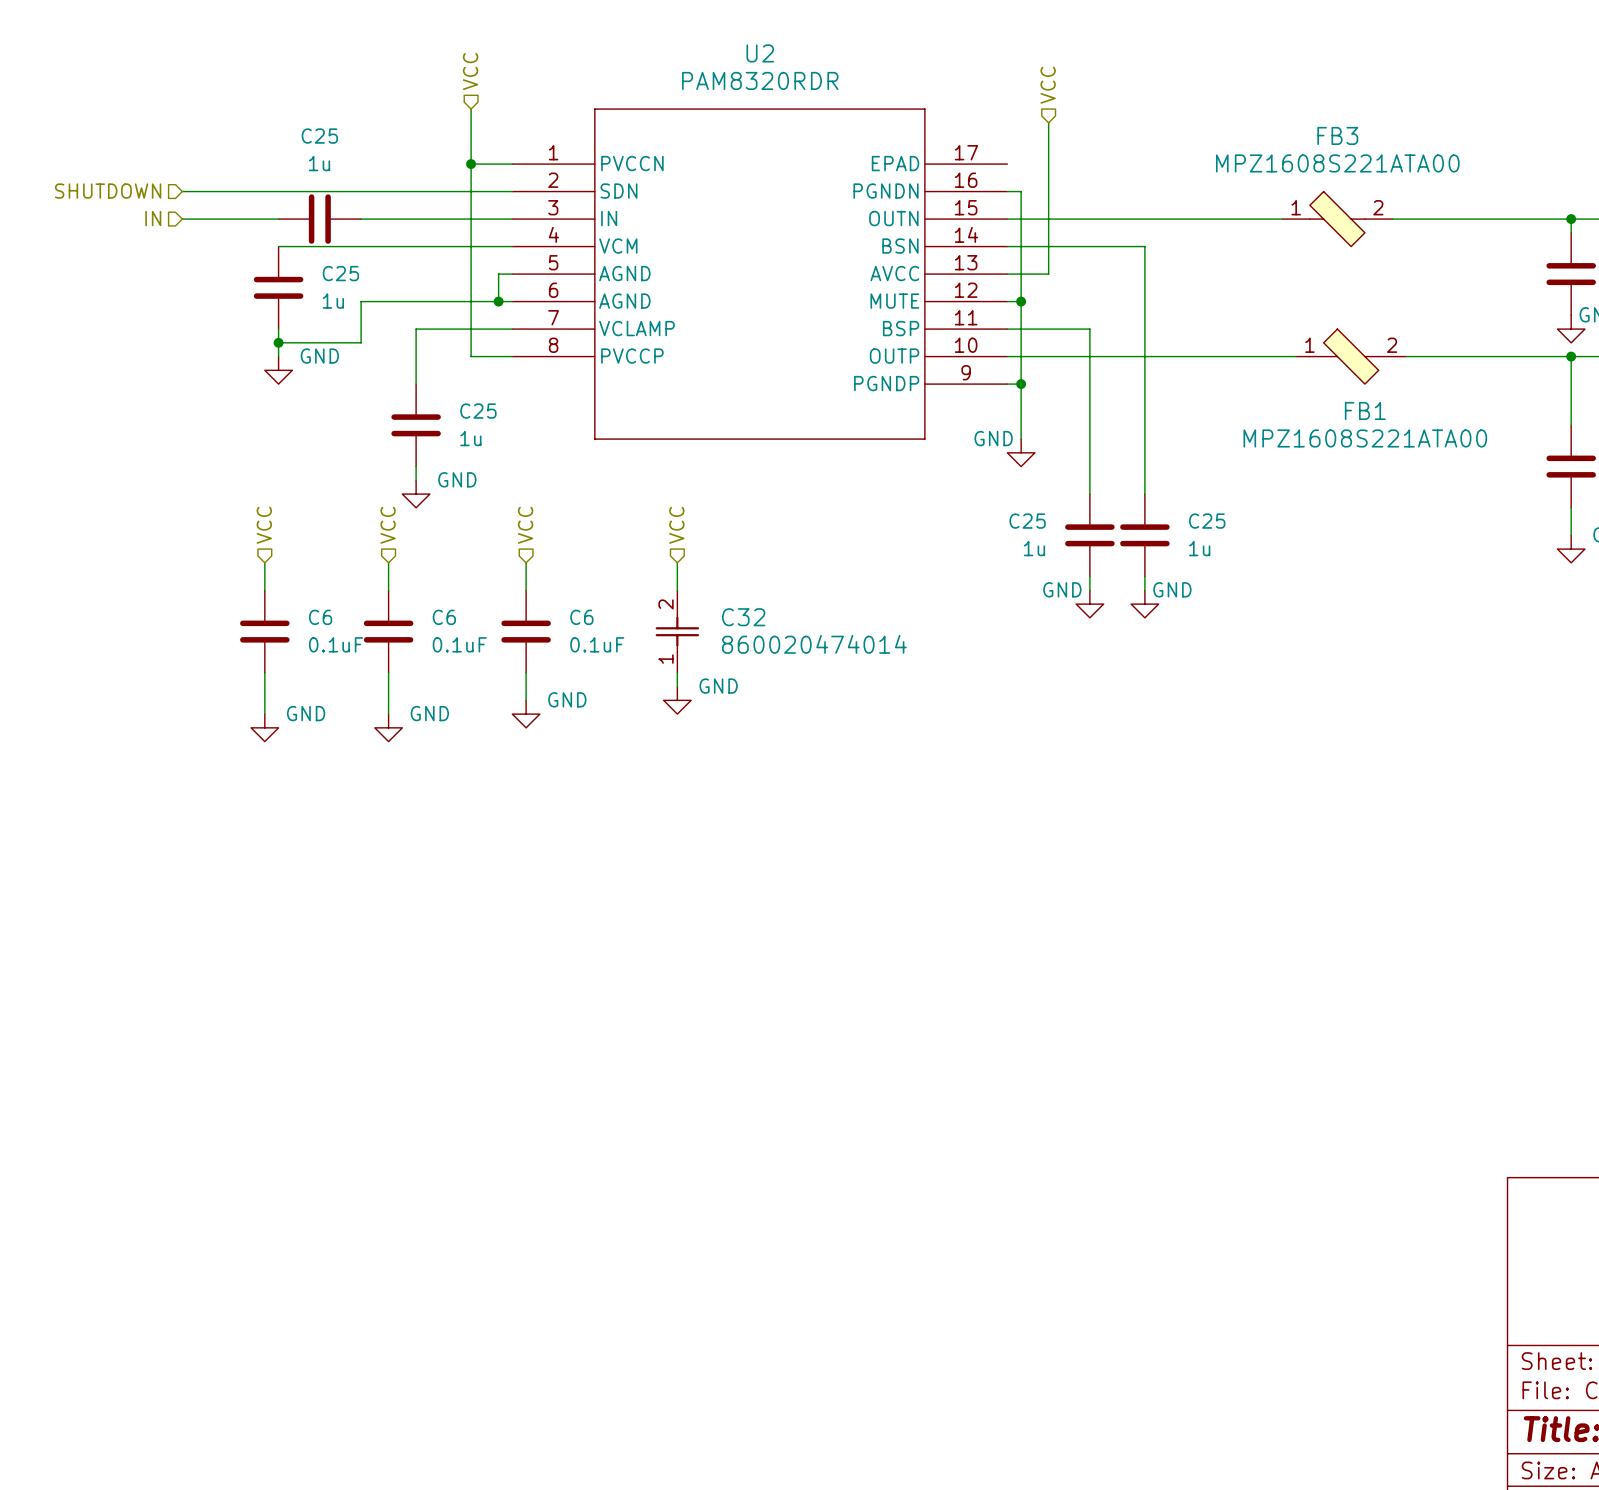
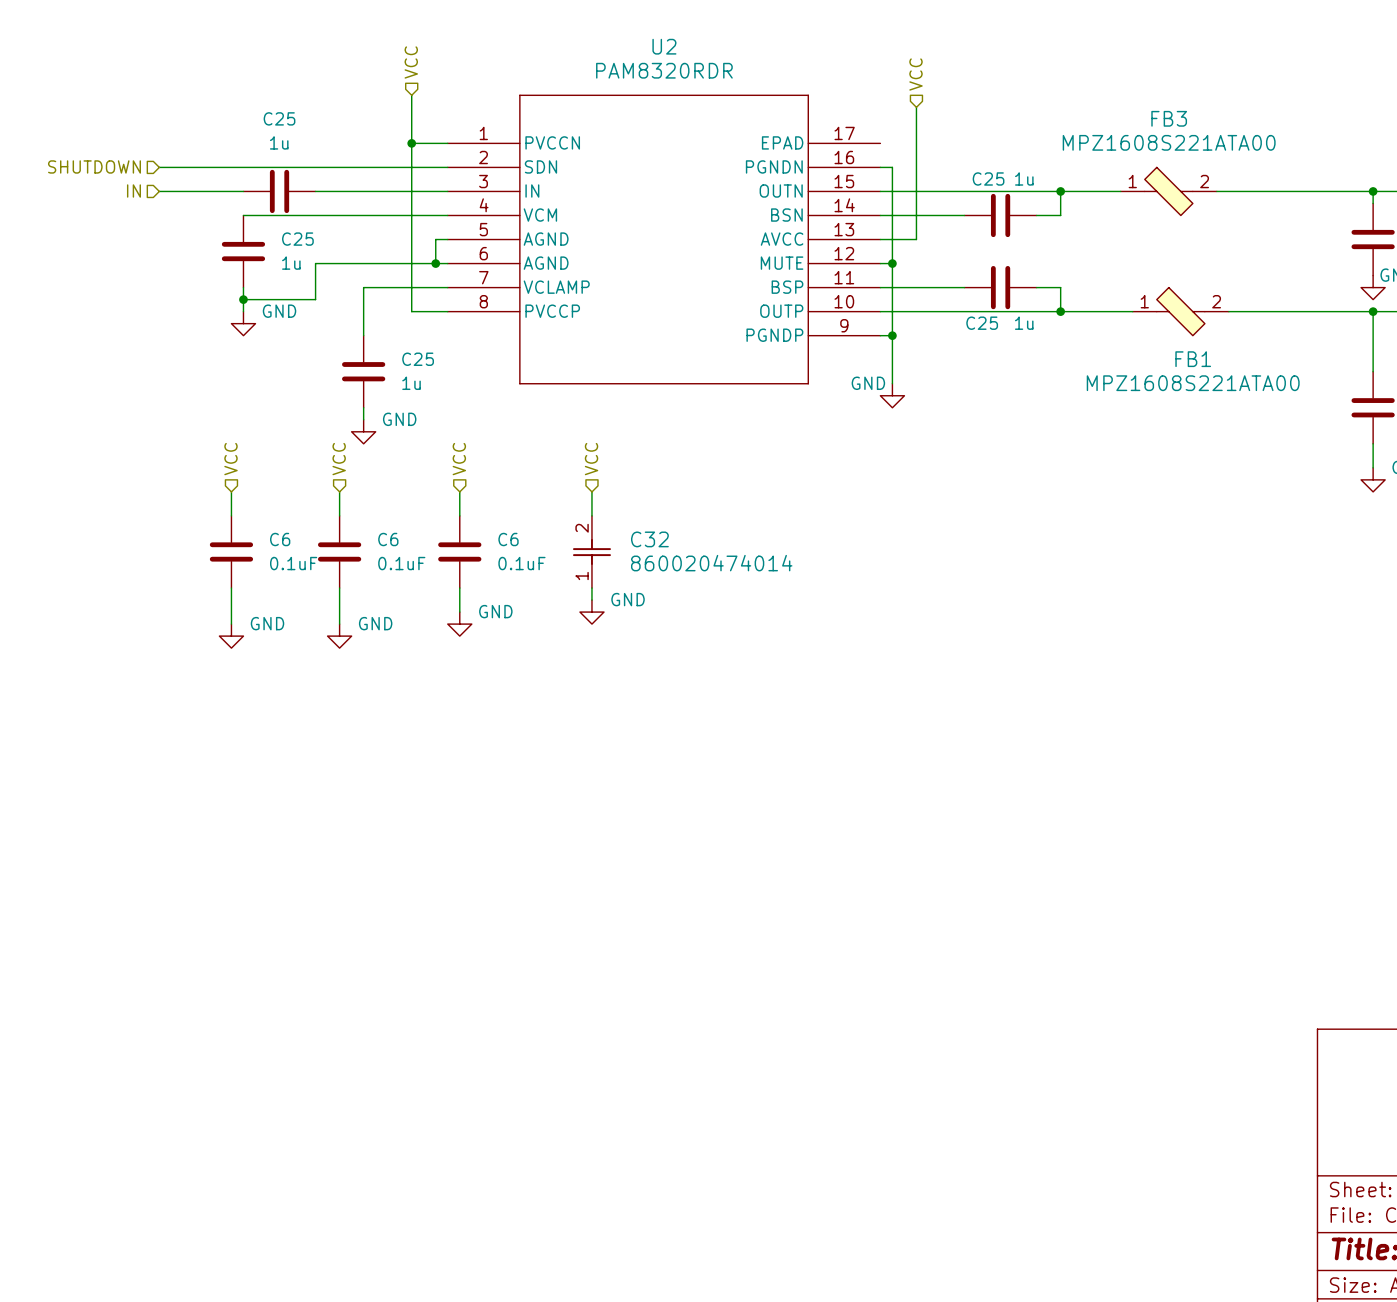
wire: none -> (1060, 191) (1060, 215) (1036, 215)
junction: none -> (1060, 191)
wire: (1103, 246) (1144, 246) (1144, 494) -> none
C25: none -> 1u (1000, 215)
wire: (1089, 329) (1089, 494) -> (952, 287) (964, 287)
C25: none -> 1u (1000, 287)
wire: none -> (1036, 287) (1060, 287) (1060, 311)
junction: none -> (1060, 311)
C25: 1u (1089, 535) -> none
C25: 1u (1144, 535) -> none
wire: (1089, 576) (1089, 590) -> none
wire: (1144, 576) (1144, 590) -> none
power symbol: GND (1089, 604) -> none
power symbol: GND (1144, 604) -> none

